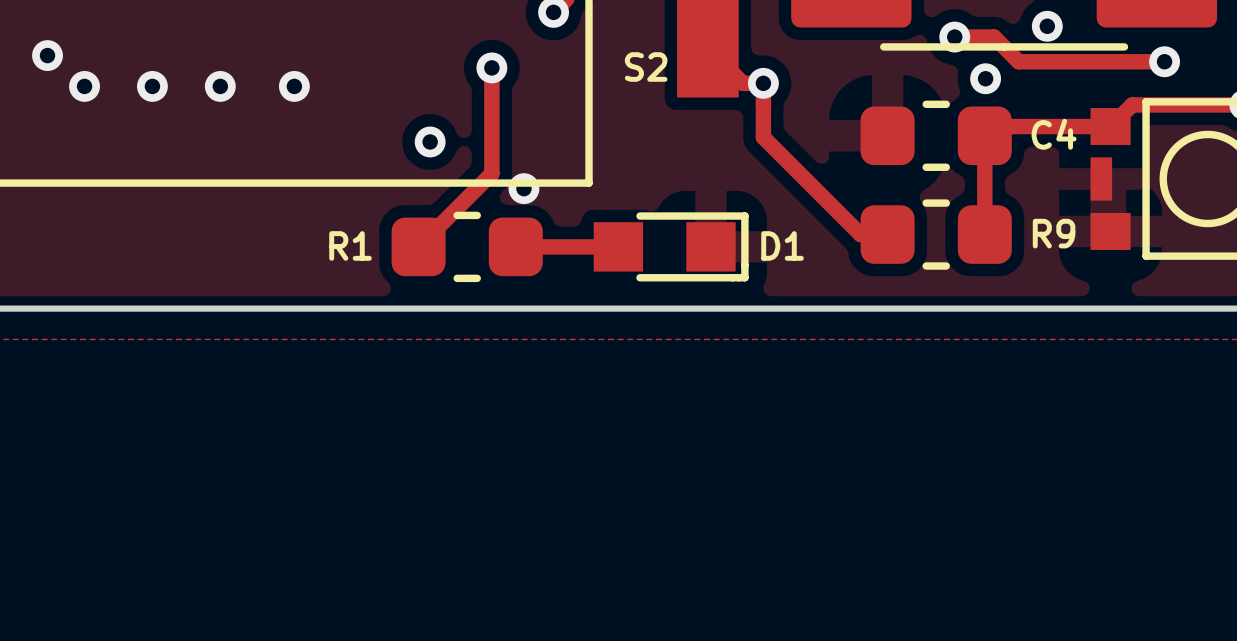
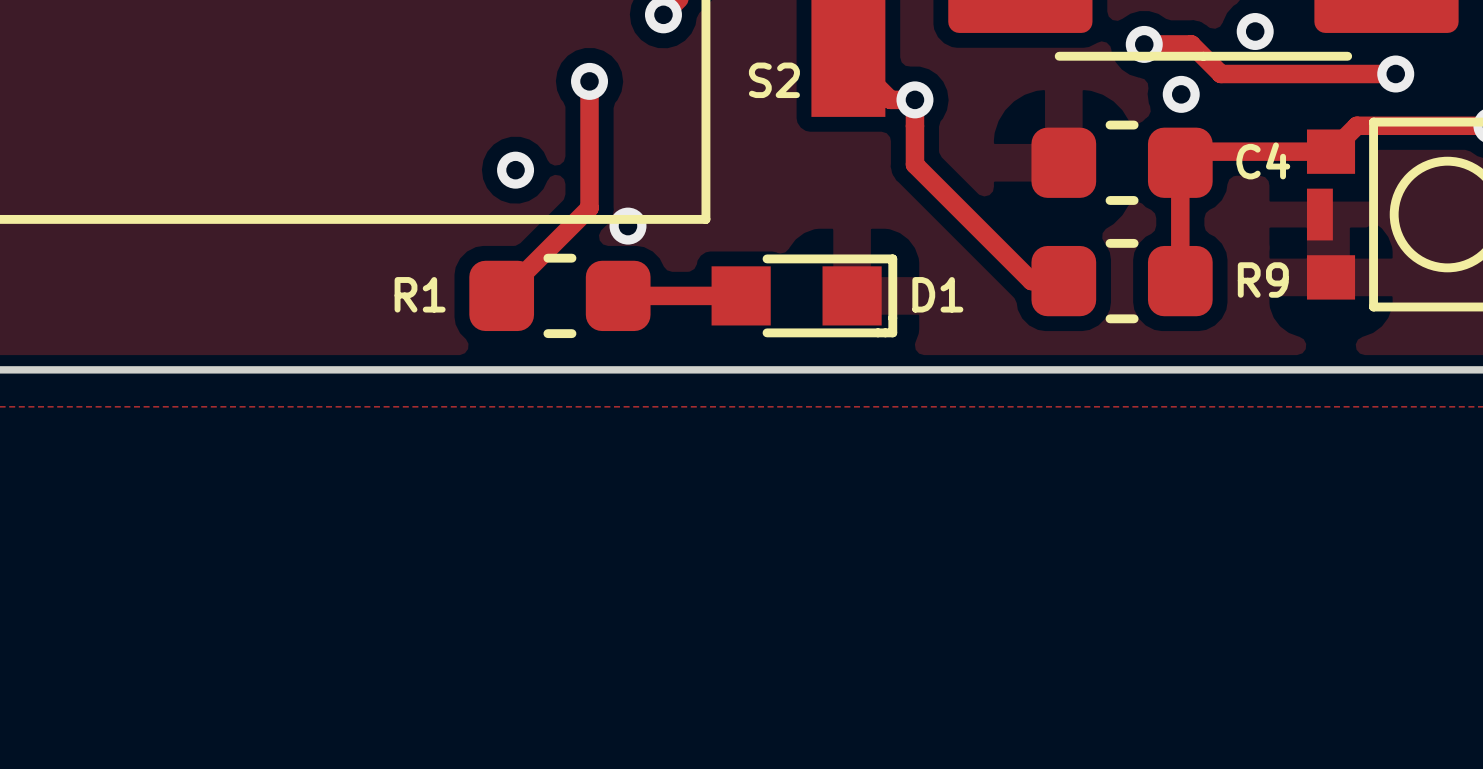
via: (47, 55) -> none
via: (84, 86) -> none
via: (152, 86) -> none
via: (220, 86) -> none
via: (294, 86) -> none

